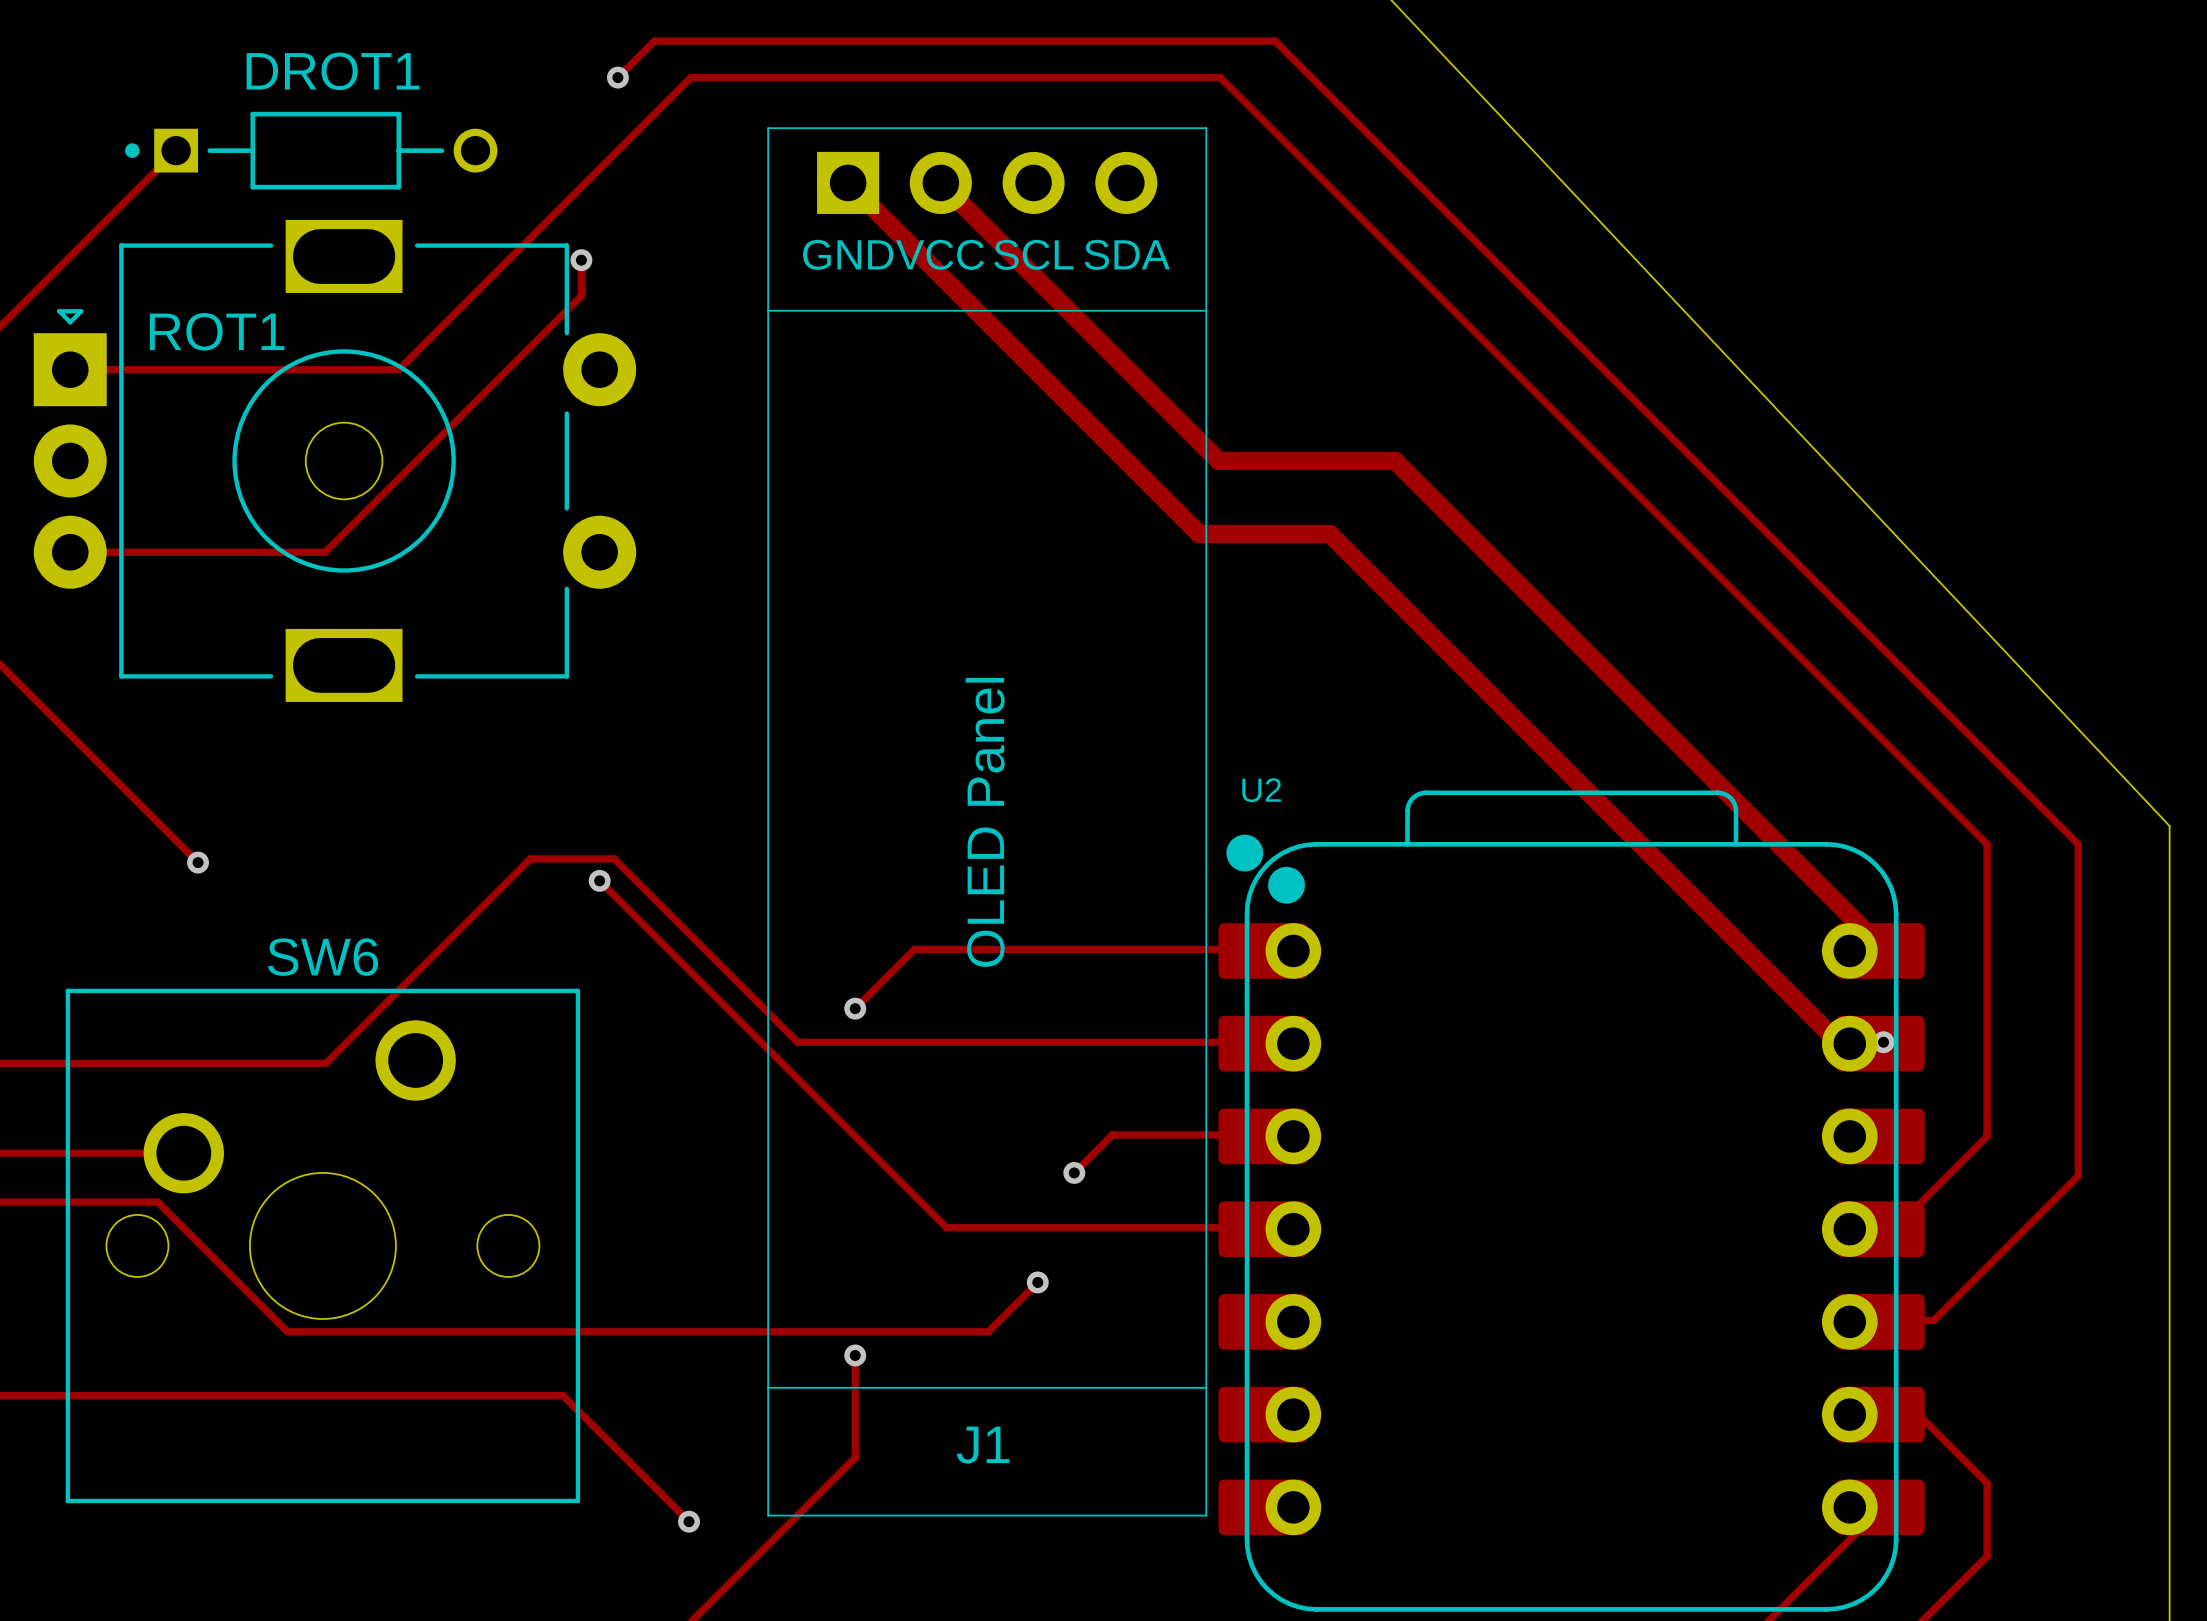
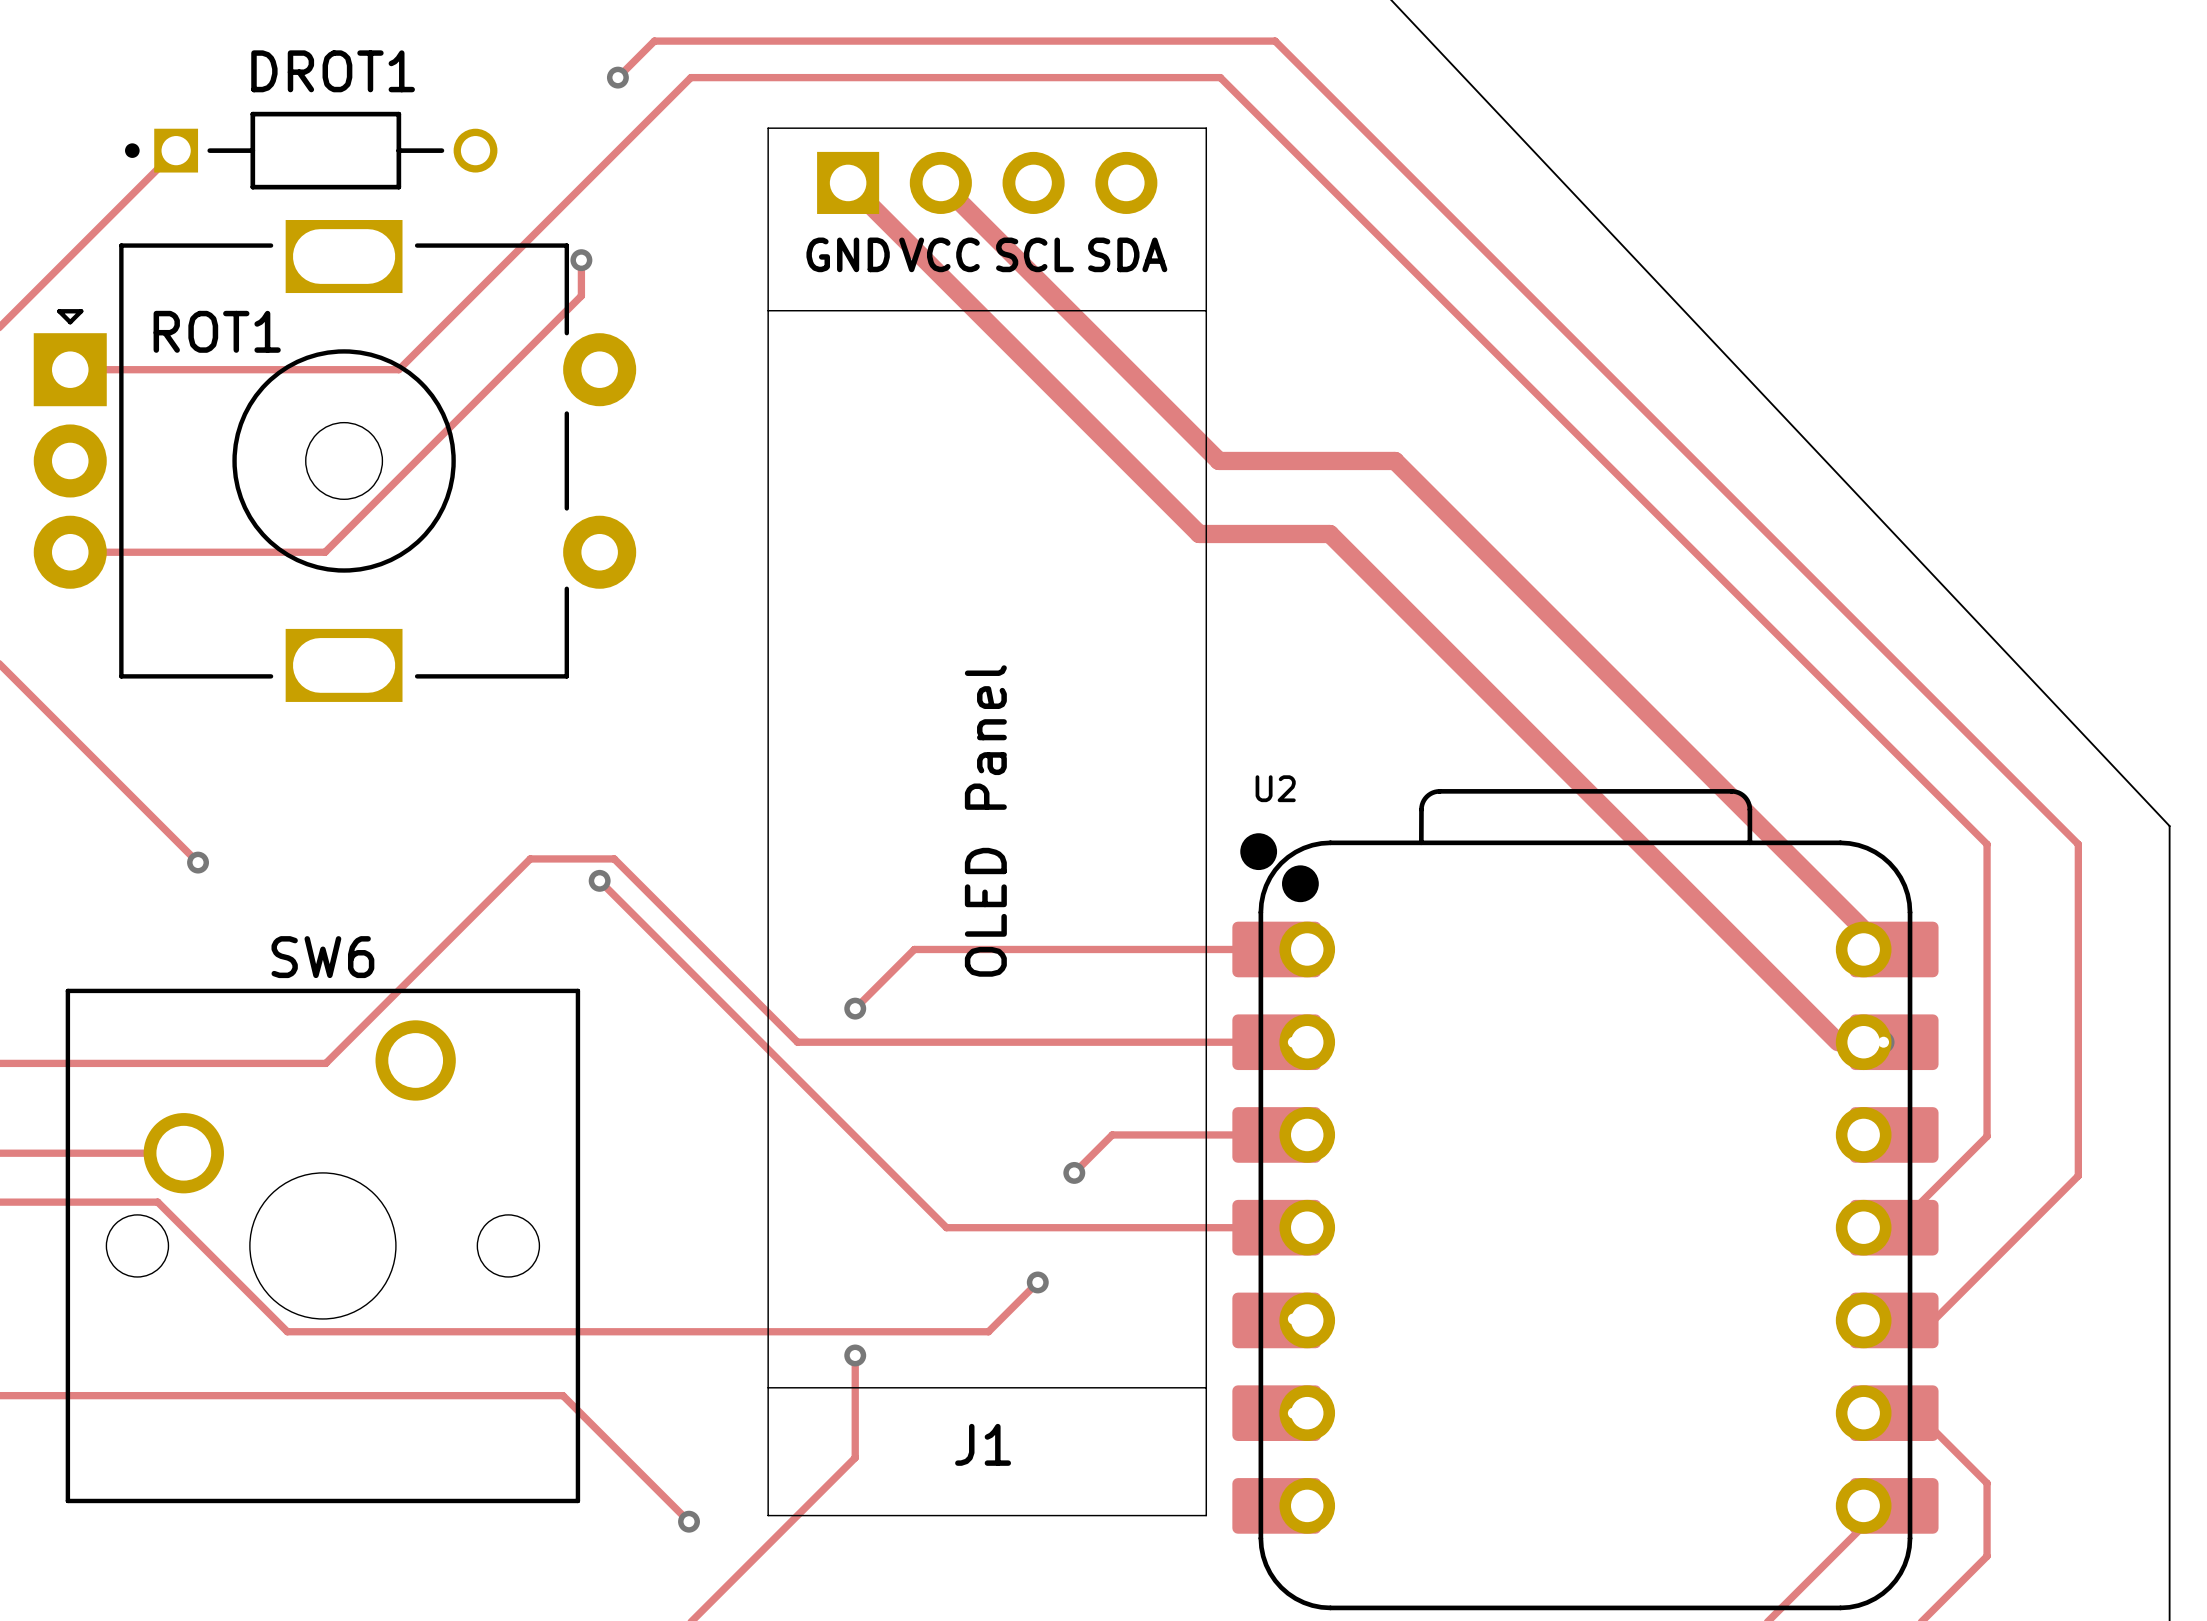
U2 position: (1571, 1201) -> (1585, 1199)

